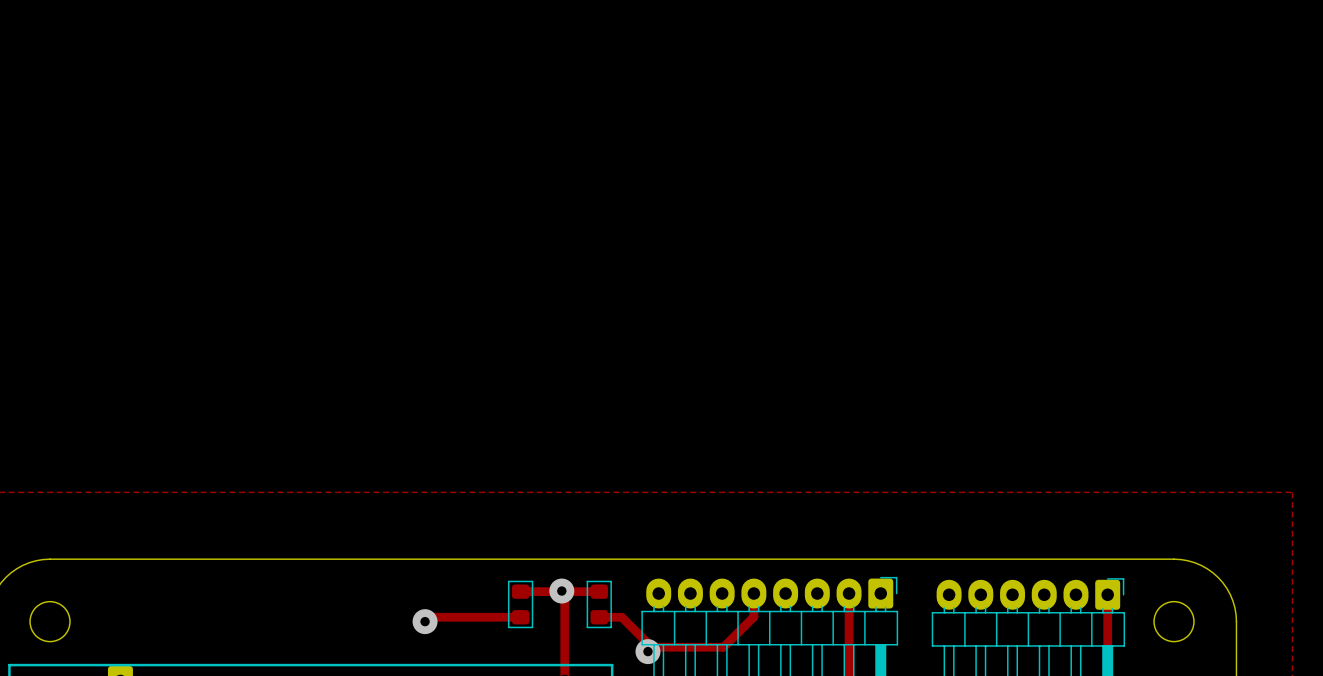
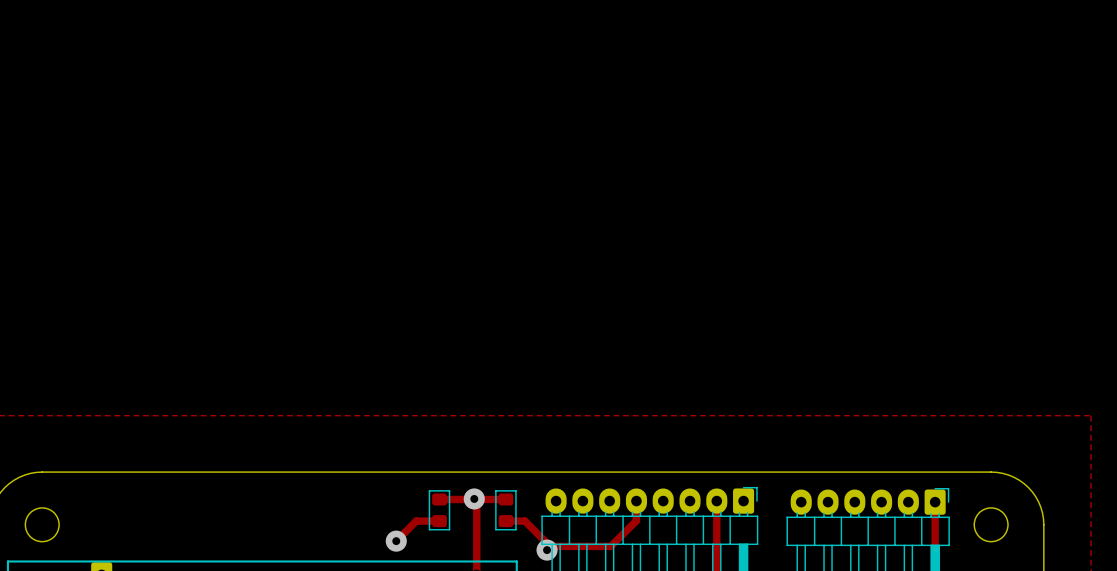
track: (493, 617) (429, 617) (425, 621) -> (416, 521) (396, 541)
via position: (425, 621) -> (396, 541)

